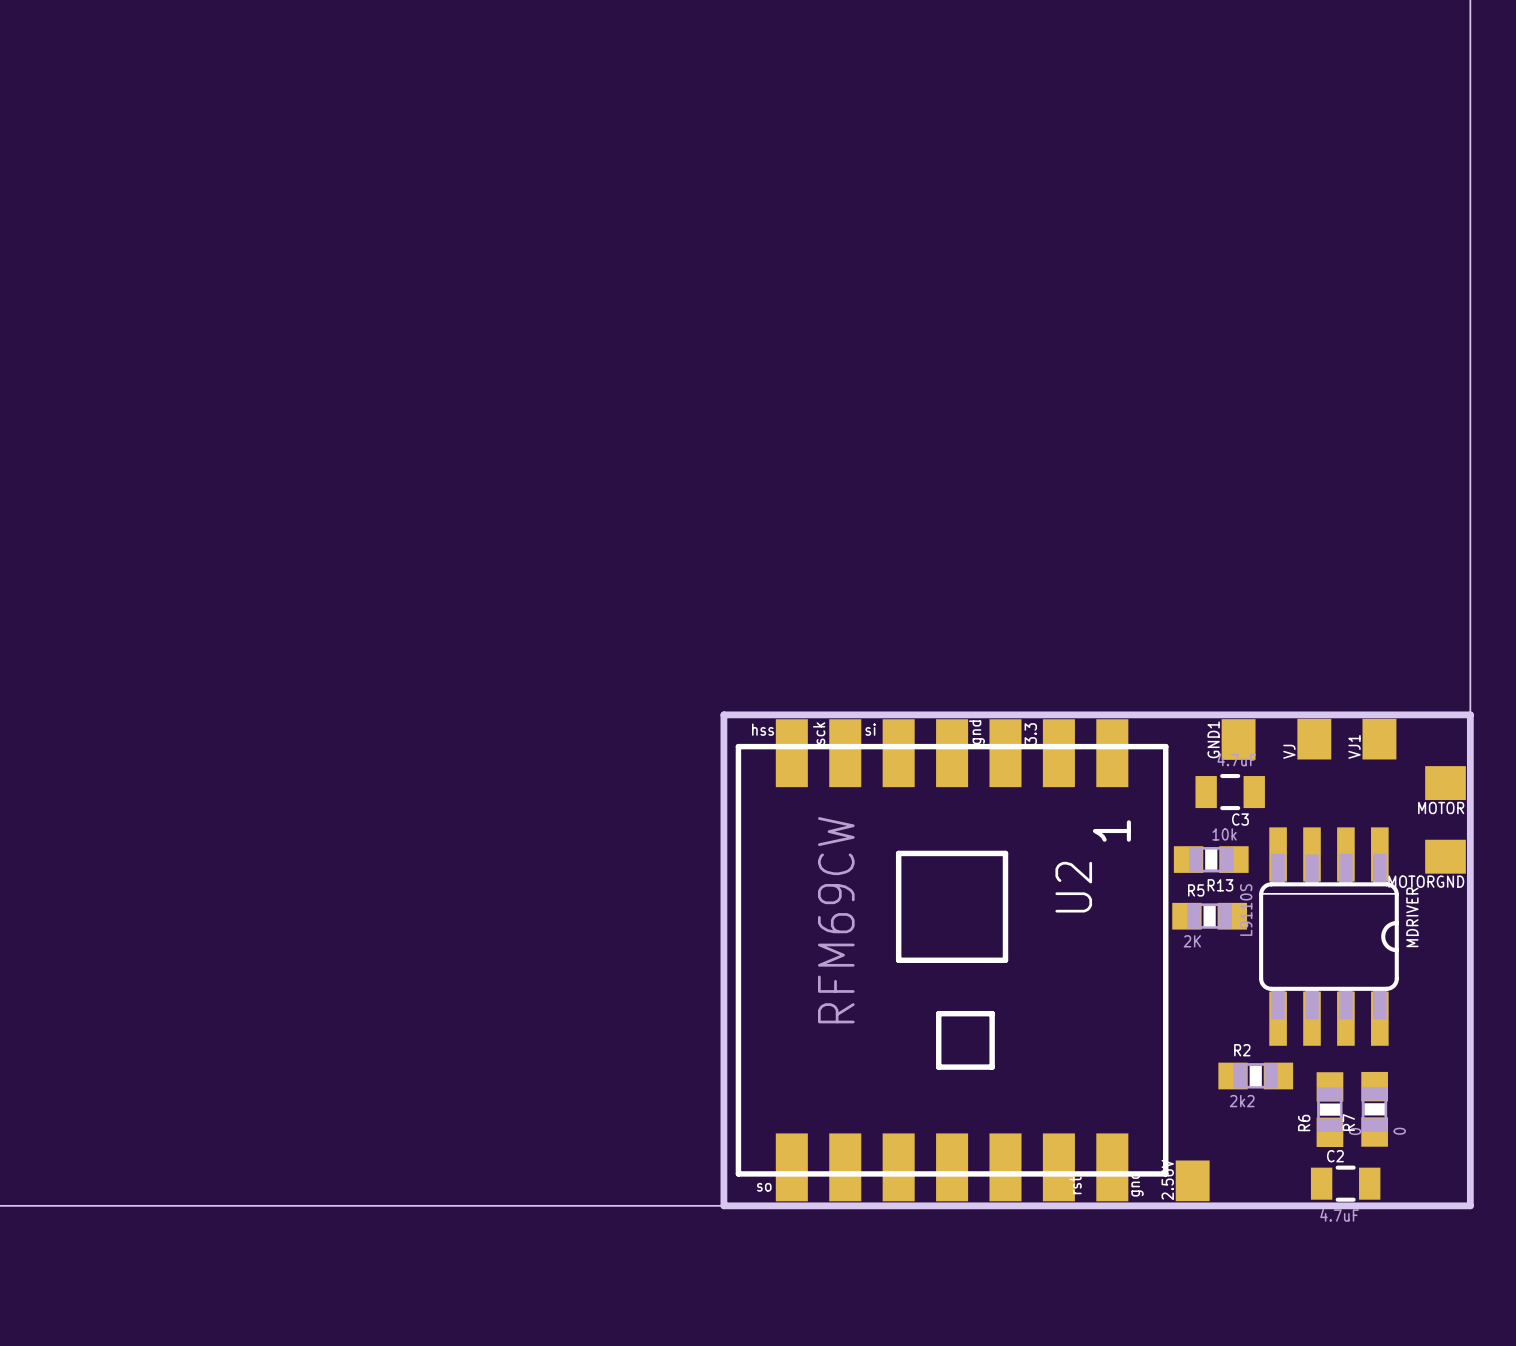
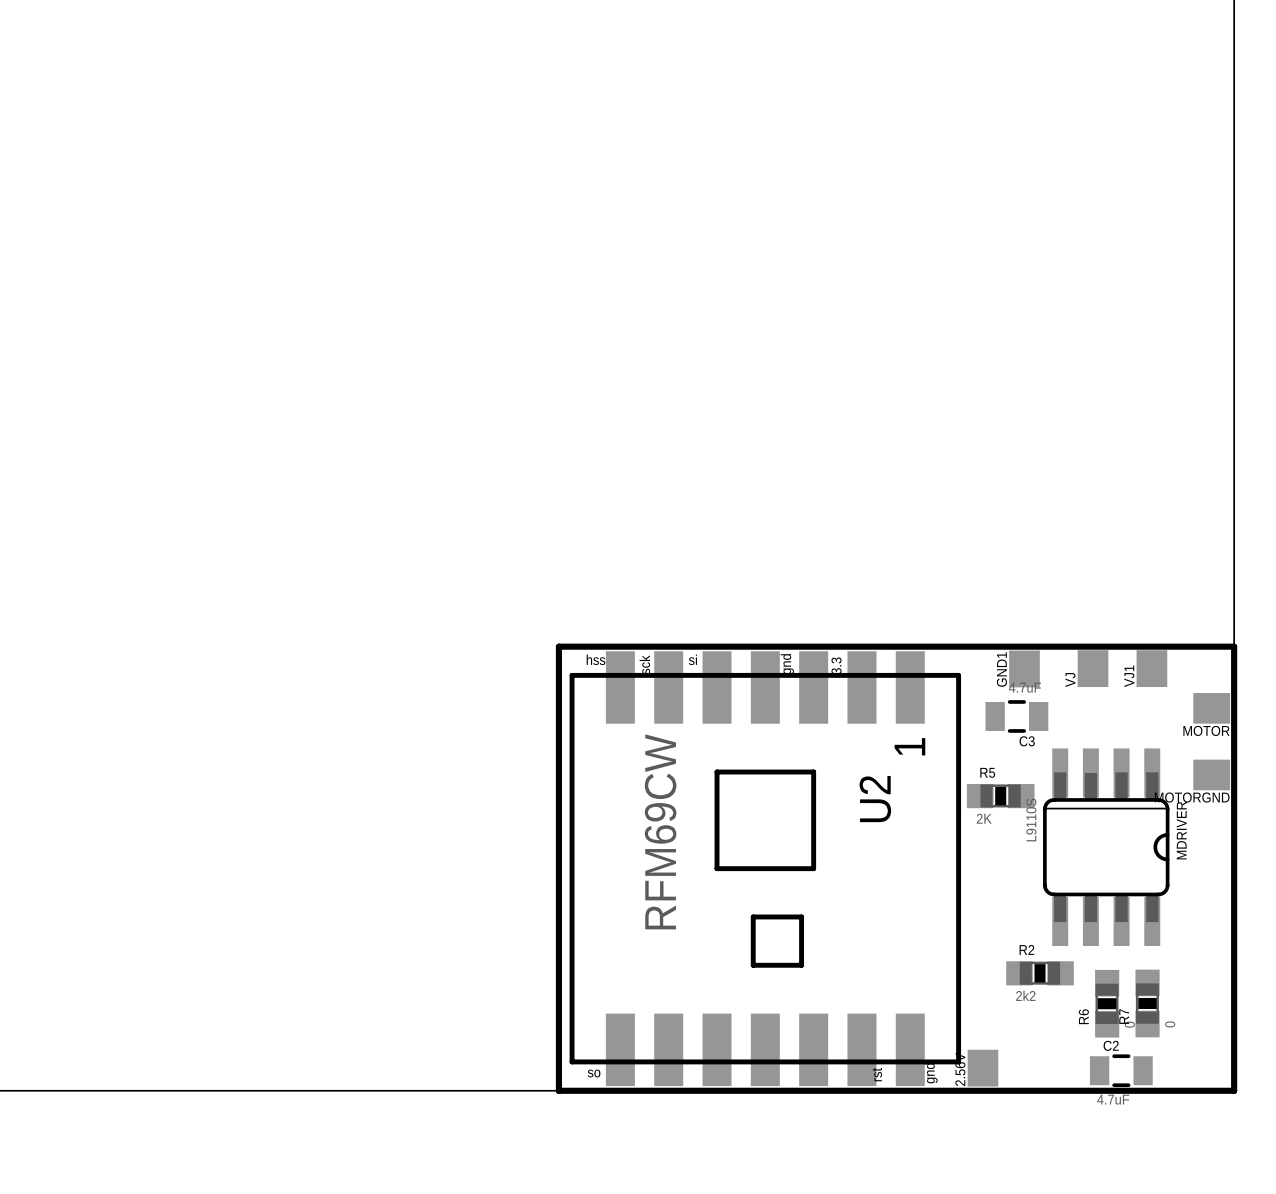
U2 footprint: [735, 719, 1169, 1202] -> [569, 651, 962, 1087]
R13: 10k (1211, 859) -> none
R5 position: (1209, 916) -> (1000, 796)

